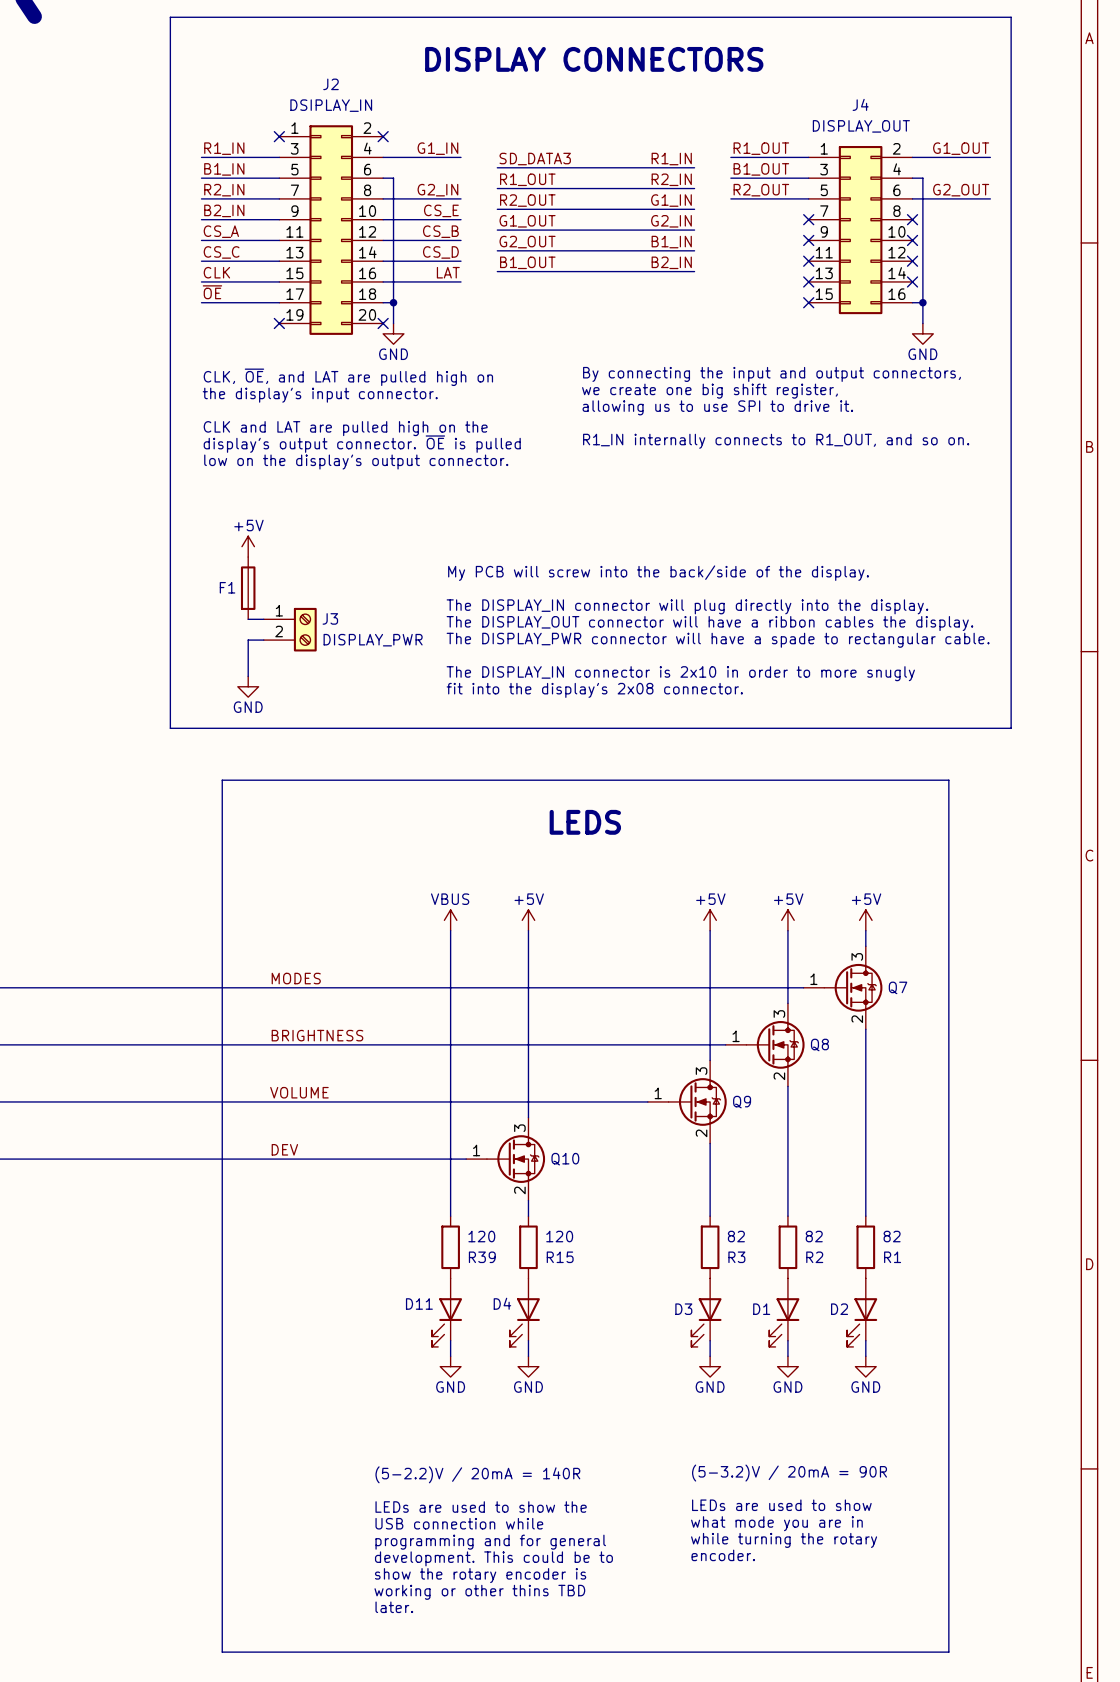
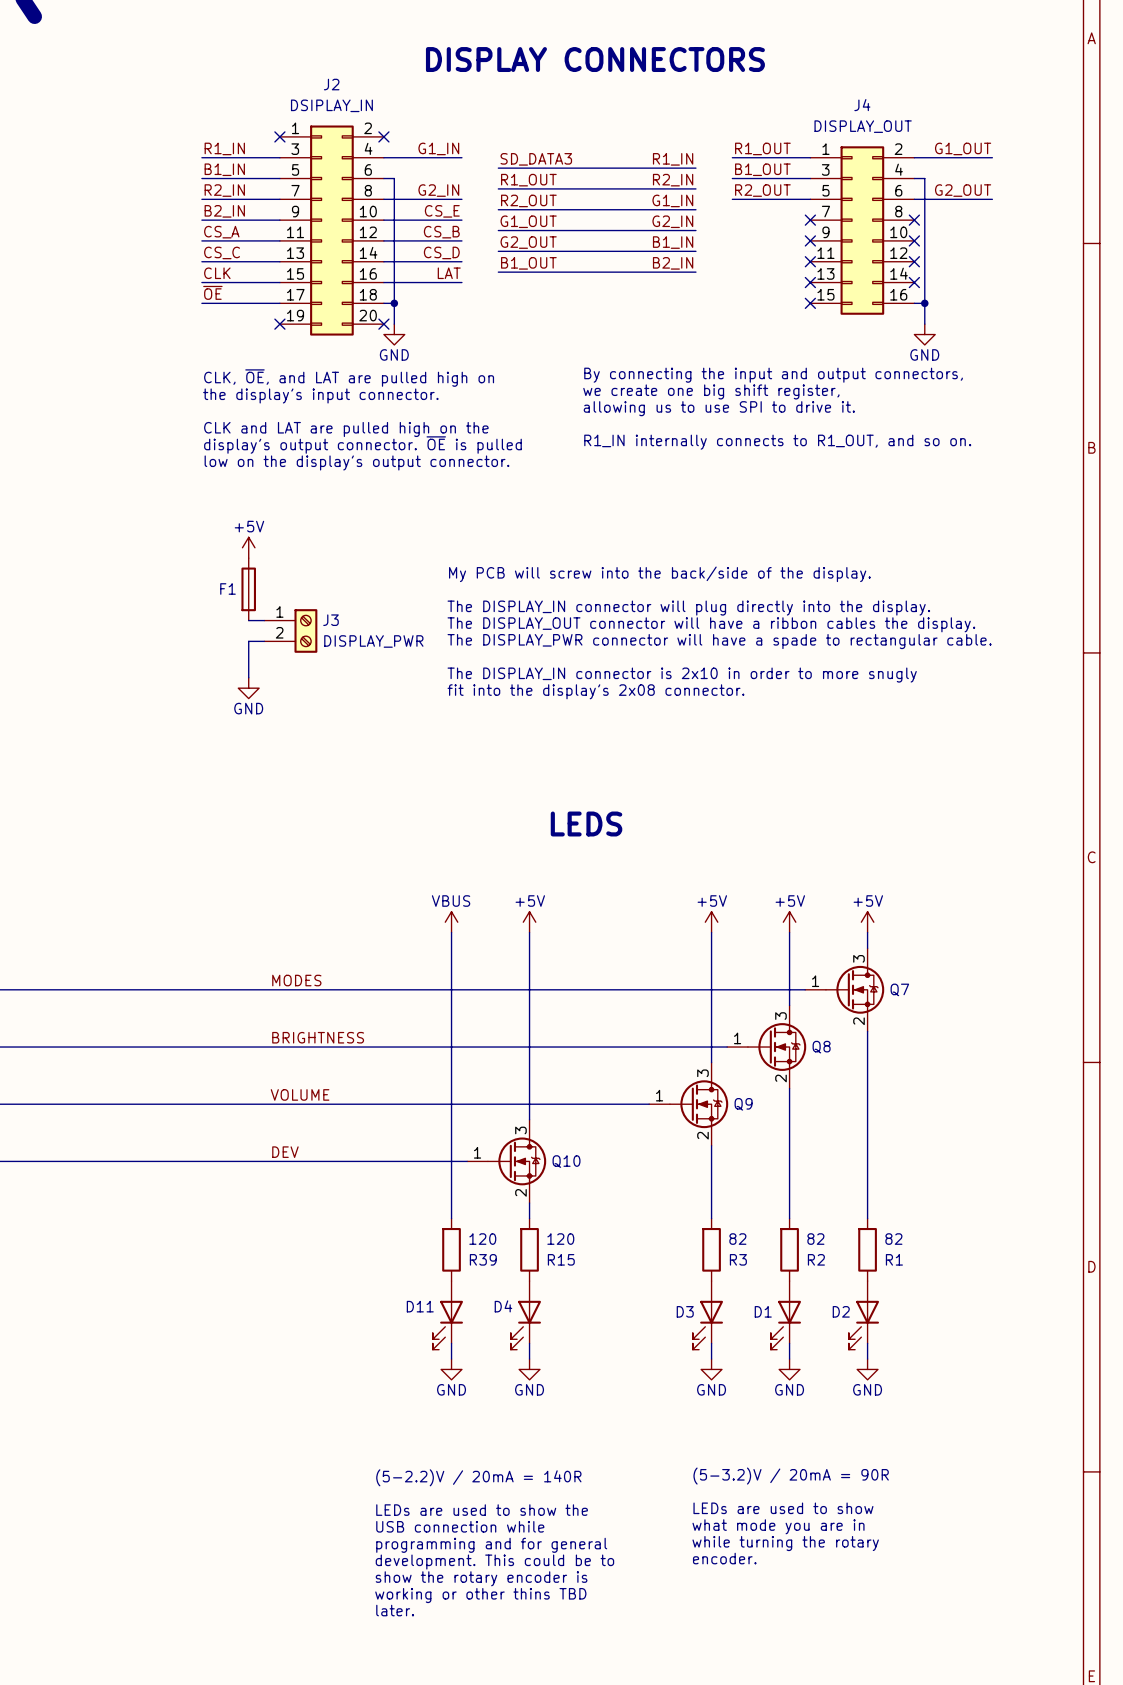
line: (170, 17) (1011, 17) (1011, 728) (170, 728) (170, 17) -> none
line: (222, 780) (948, 780) (948, 1652) (222, 1652) (222, 780) -> none

